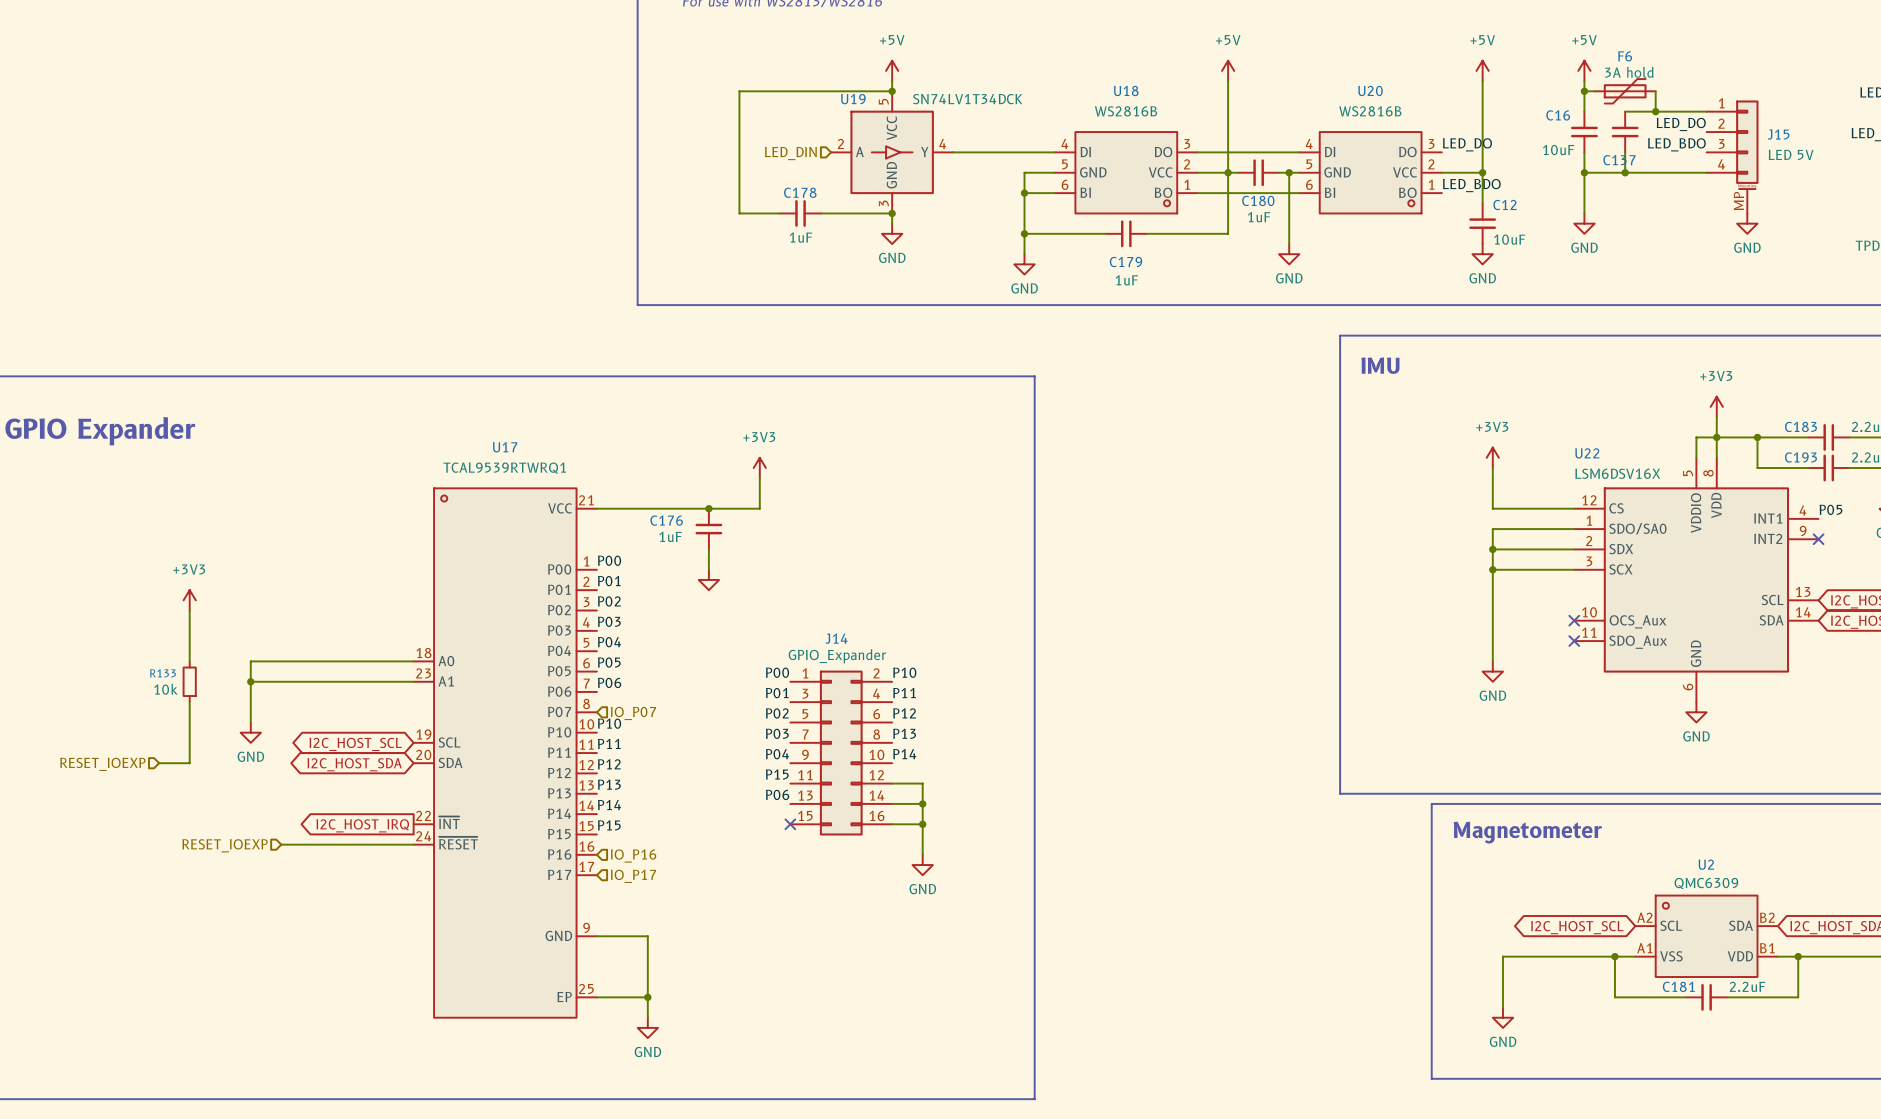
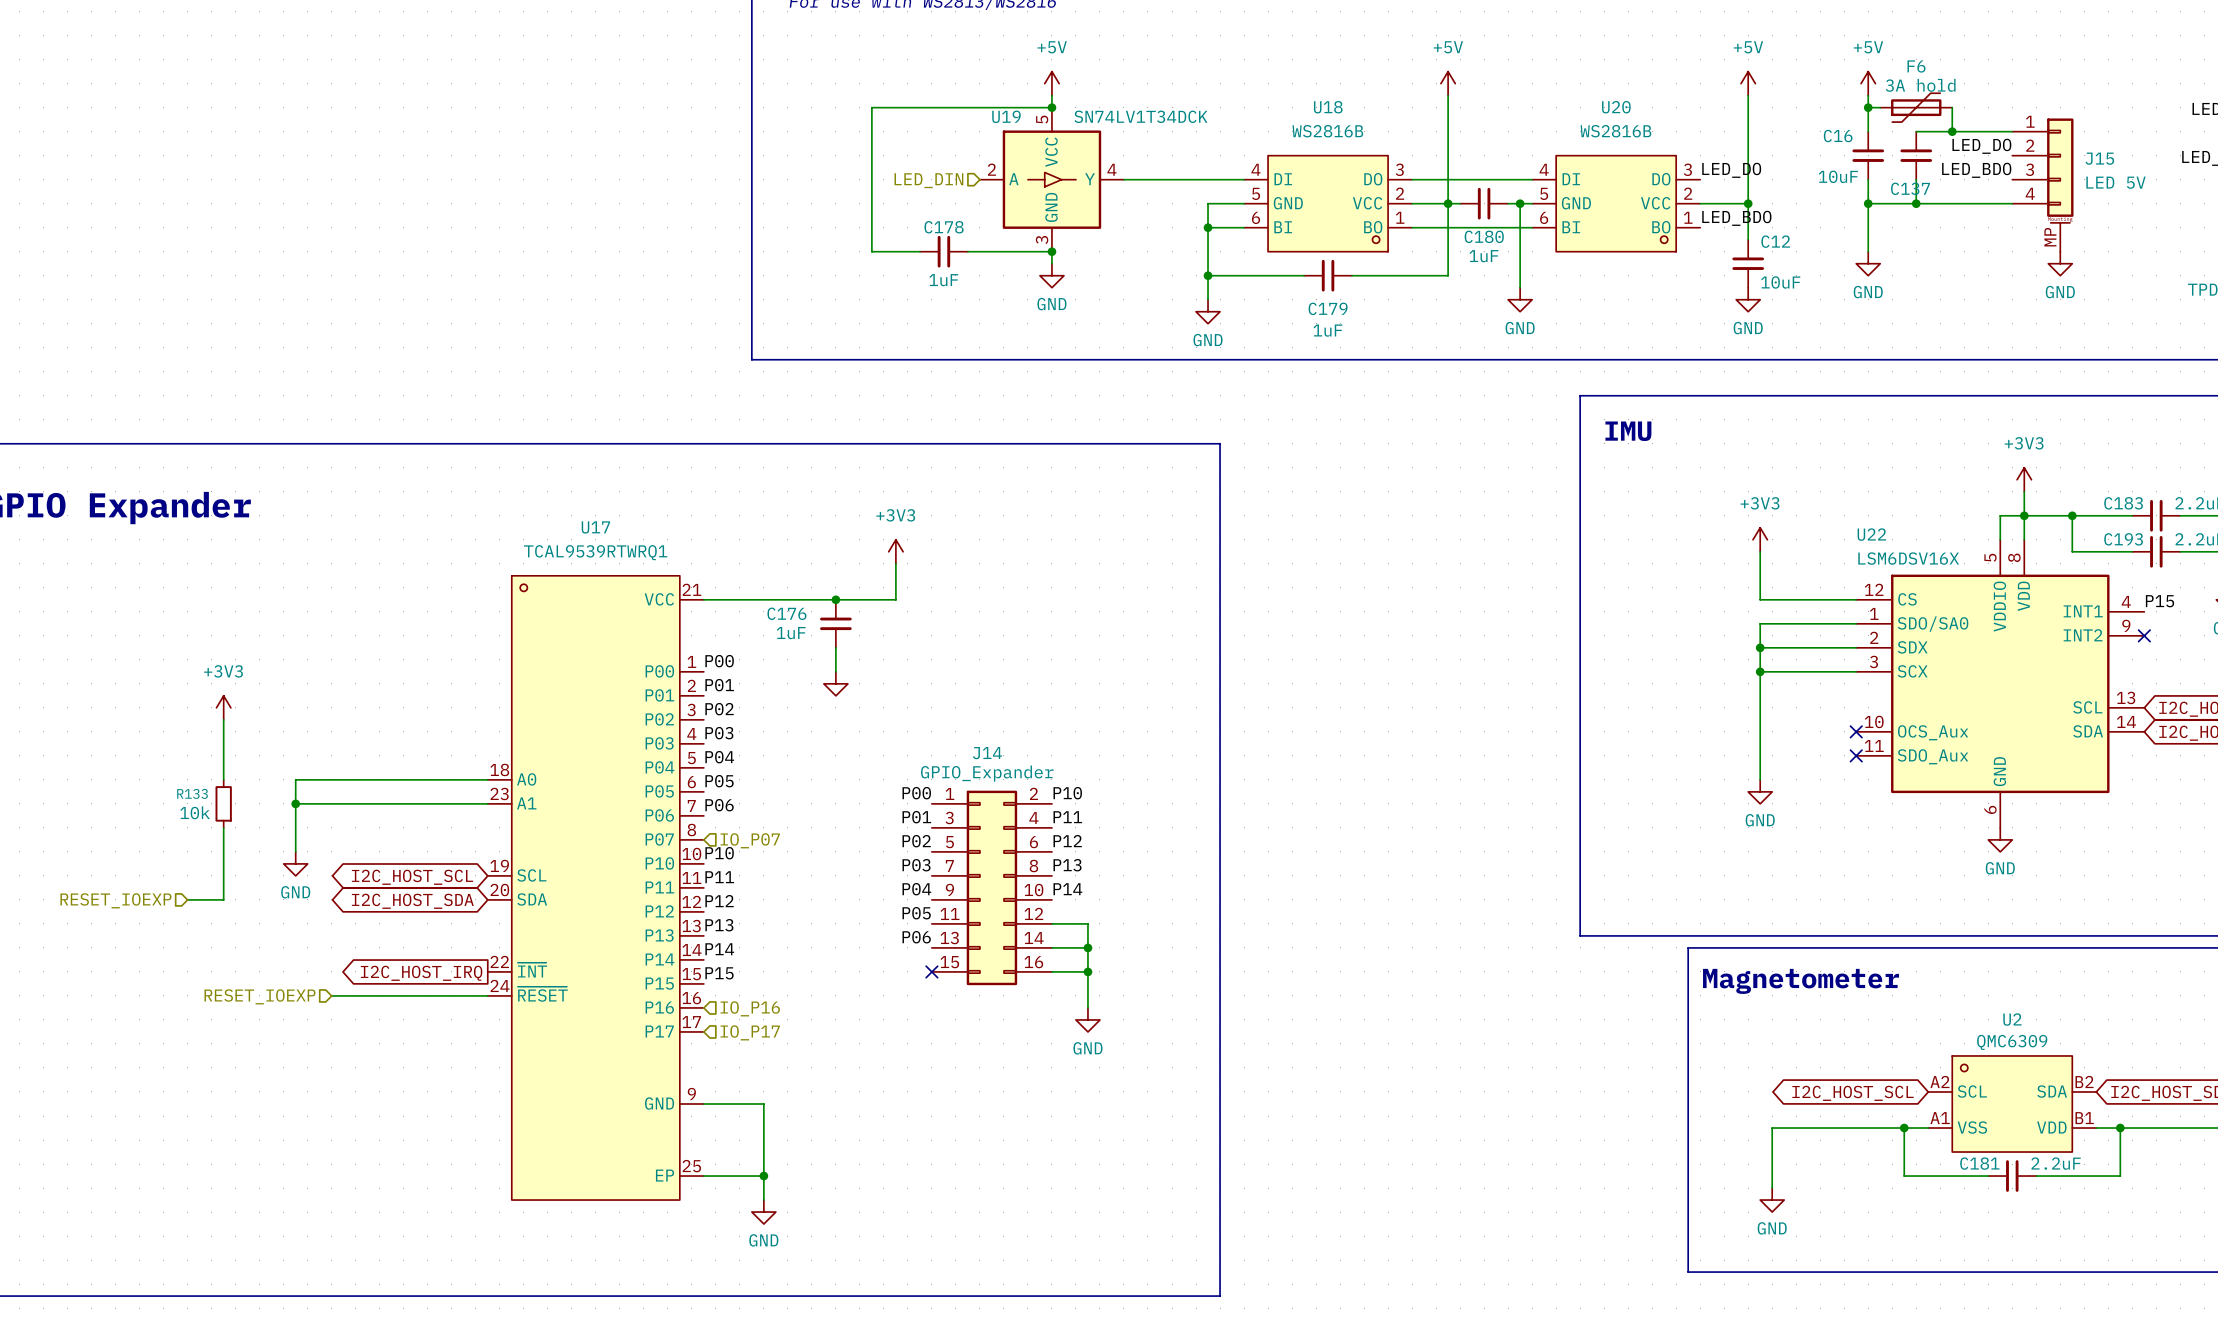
label: P05 (1830, 509) -> P15 (2160, 601)
label: P15 (777, 774) -> P05 (916, 913)

